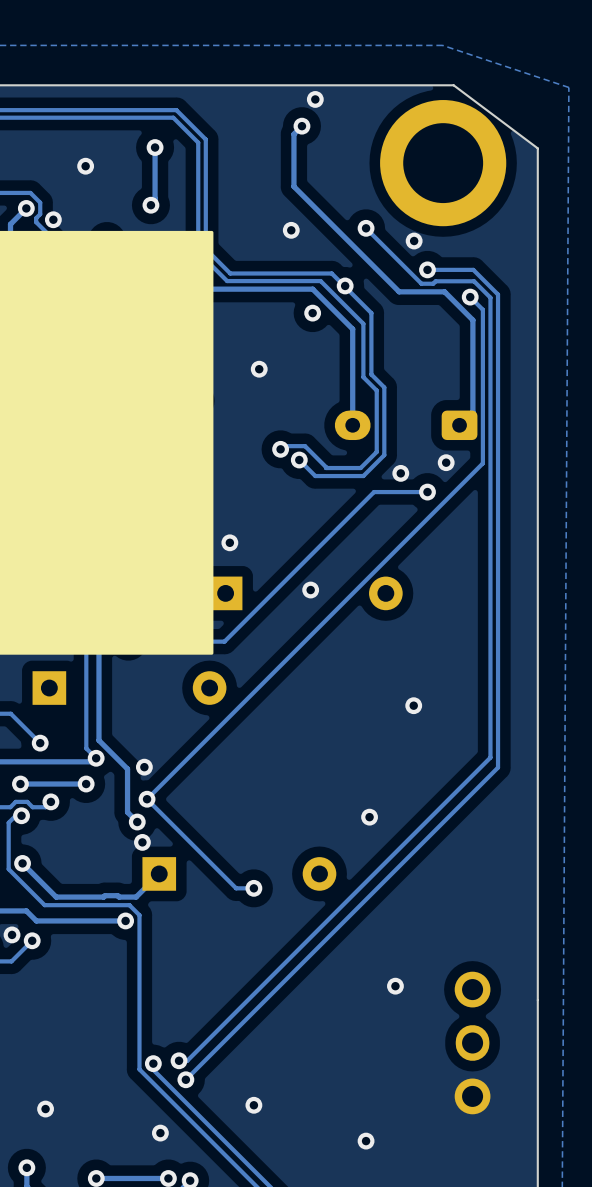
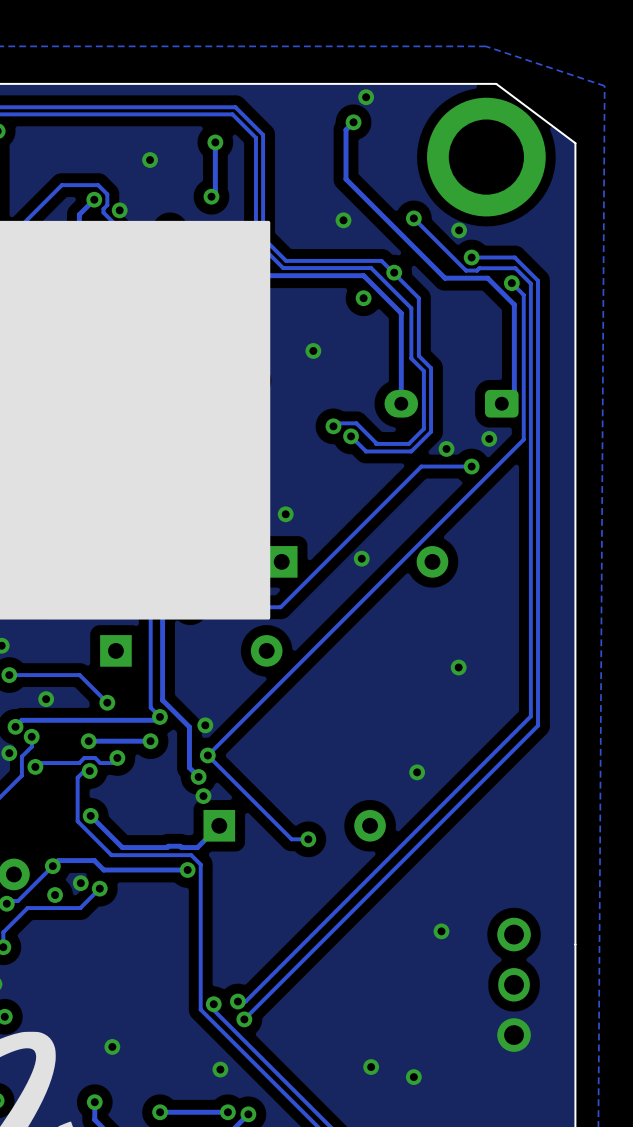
via position: (253, 1105) -> (371, 1067)

